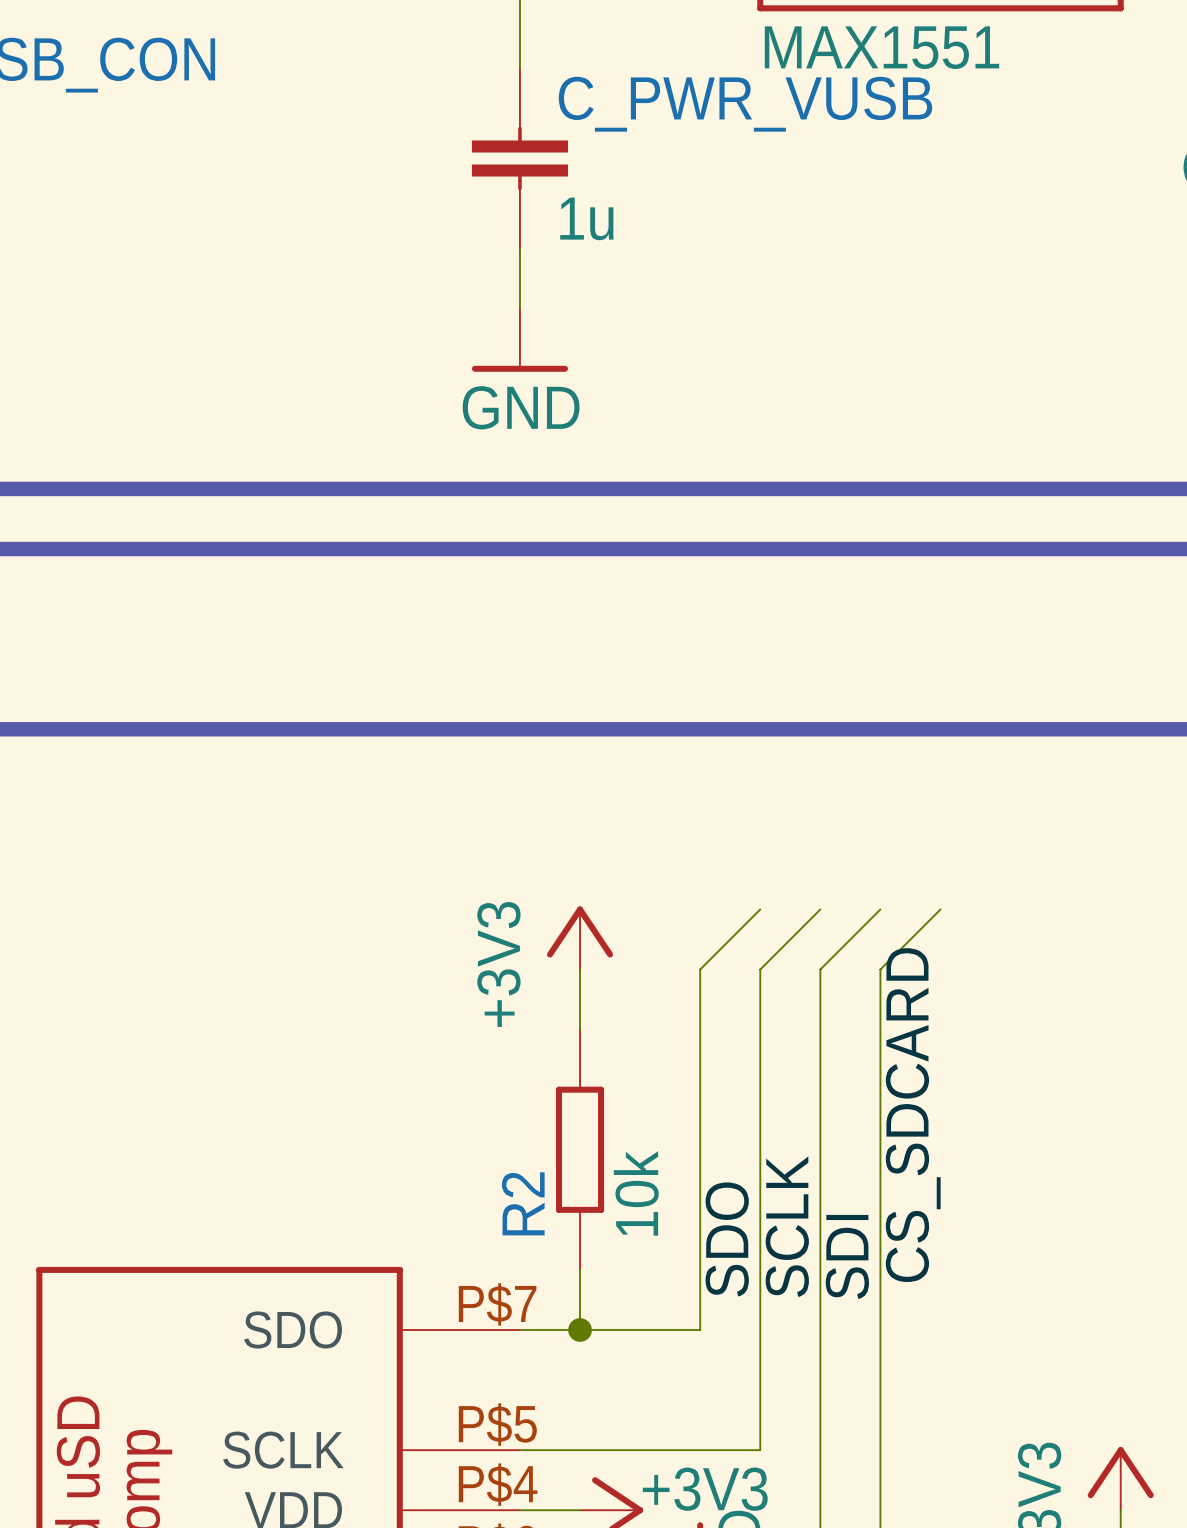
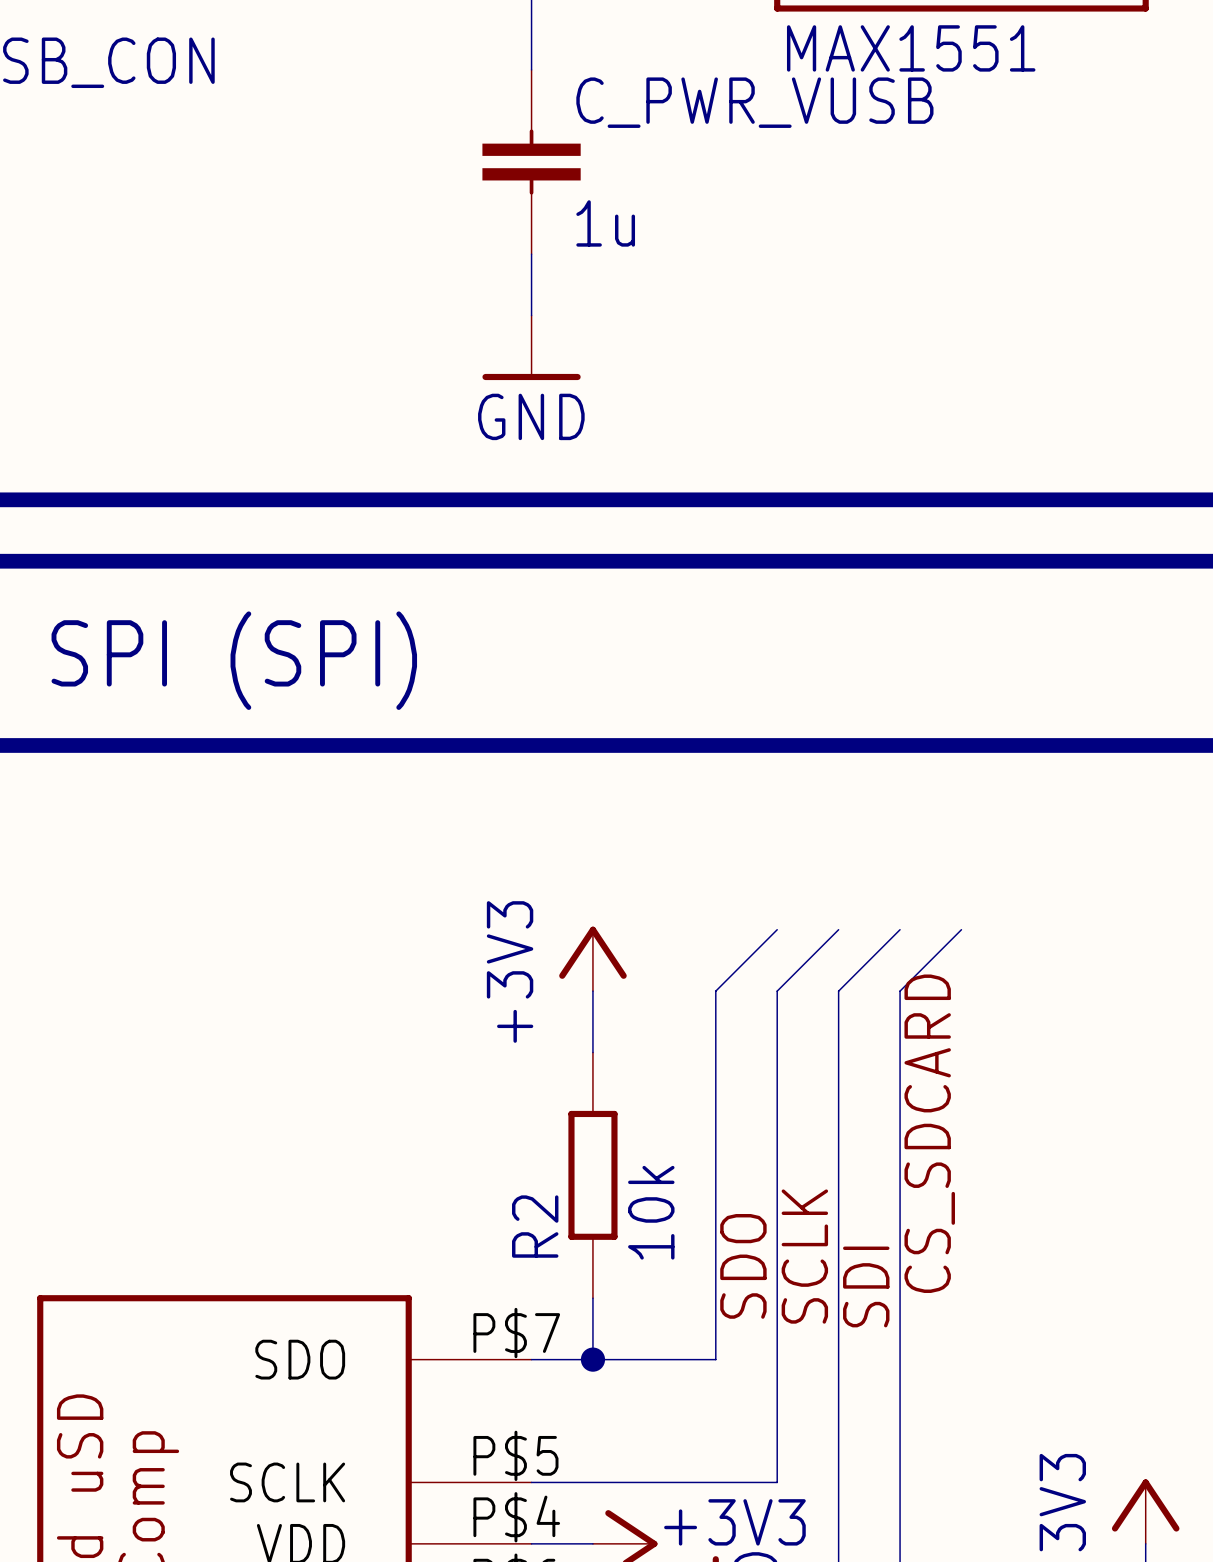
text: none -> SPI (SPI) (234, 660)

